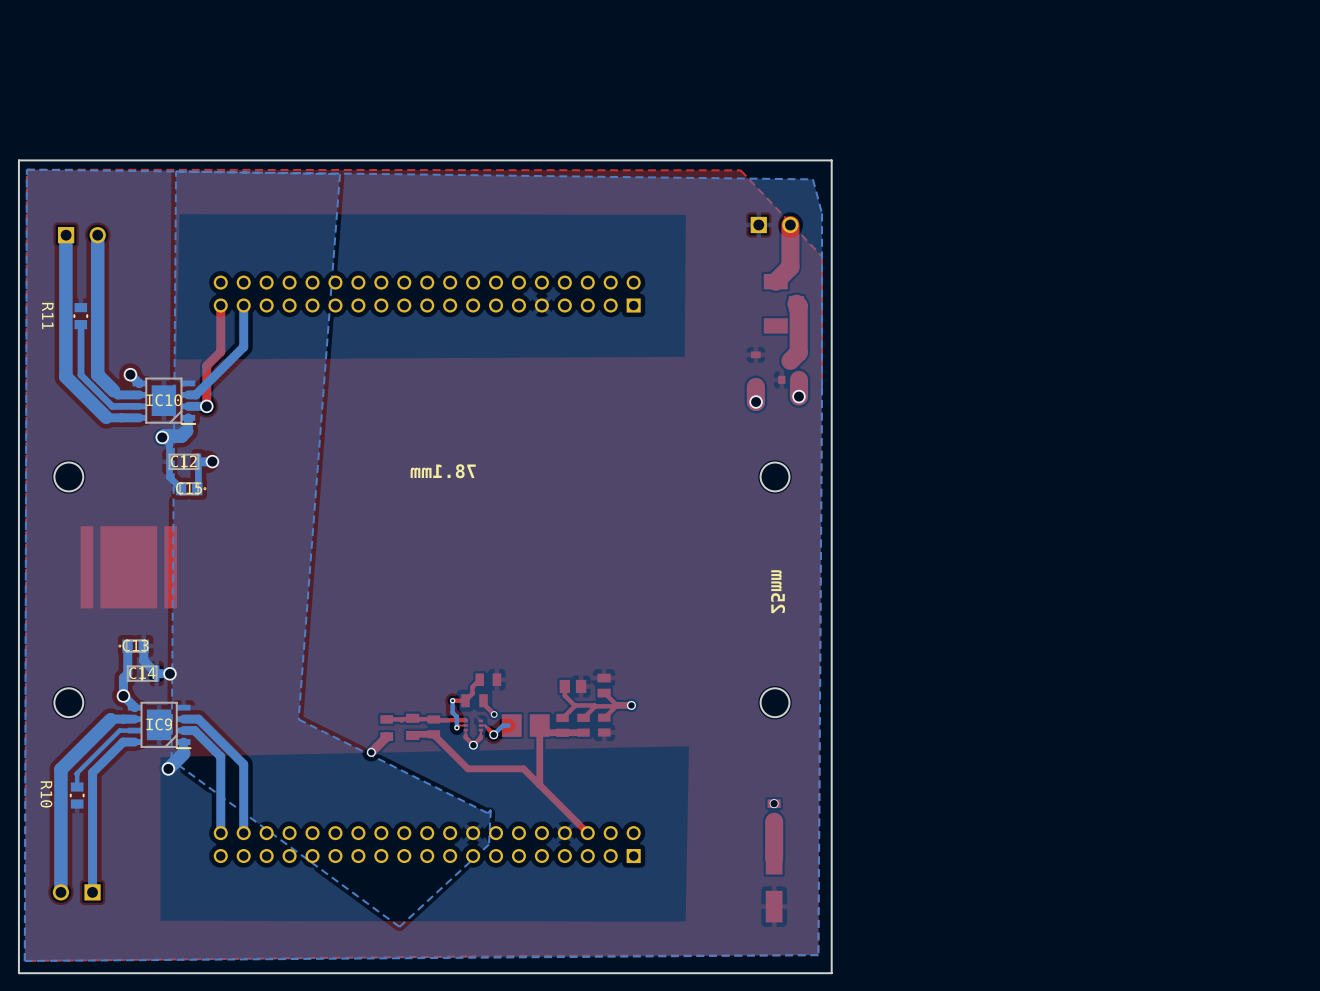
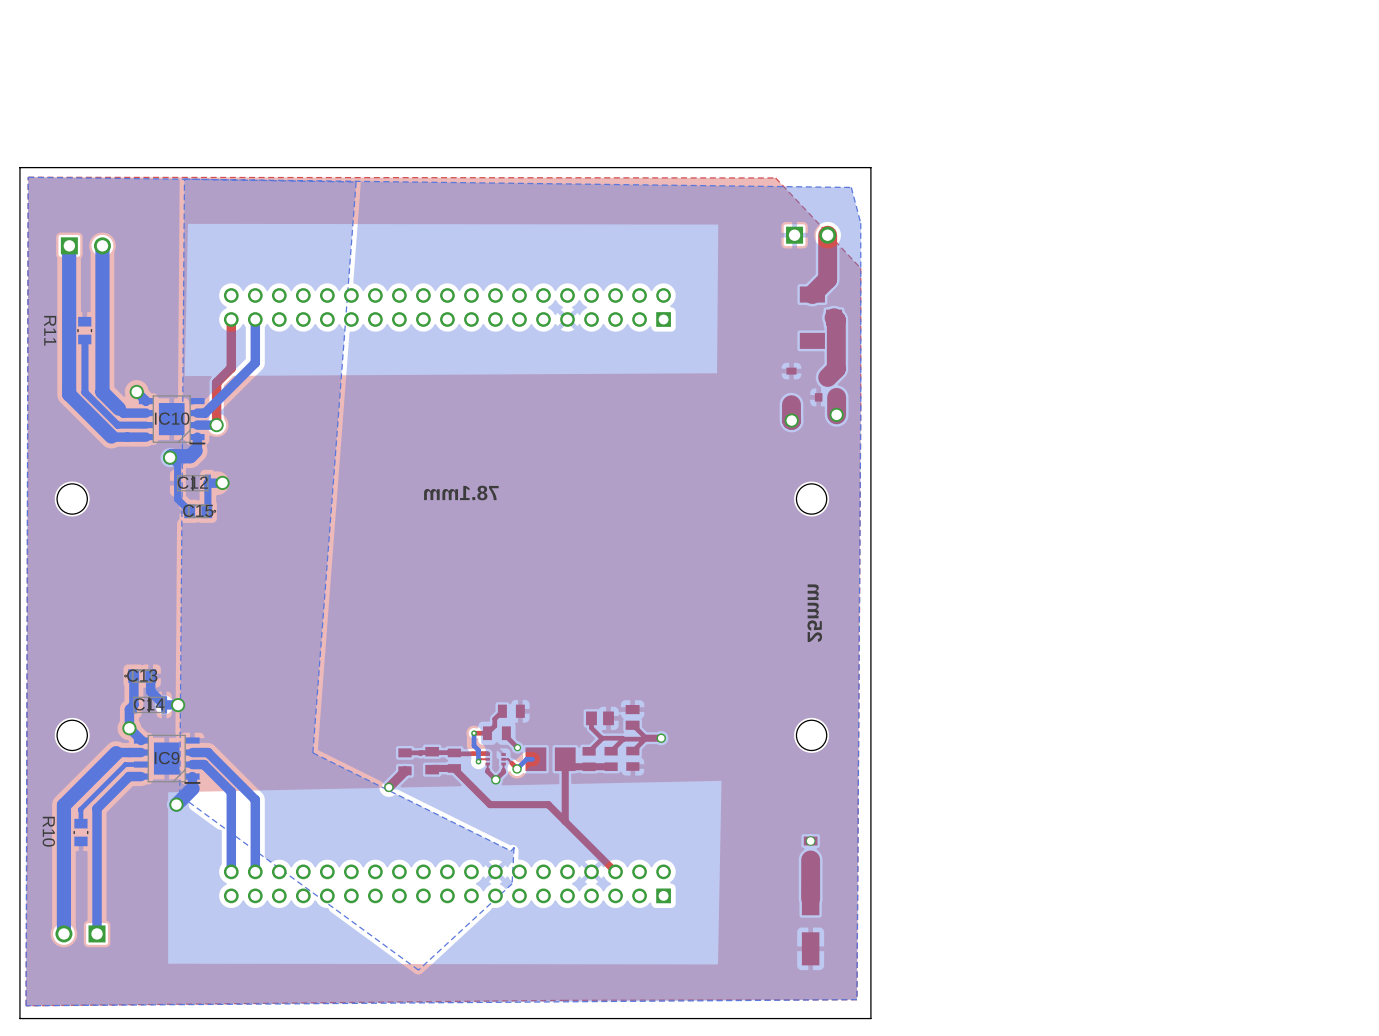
part: (128, 567) -> none

